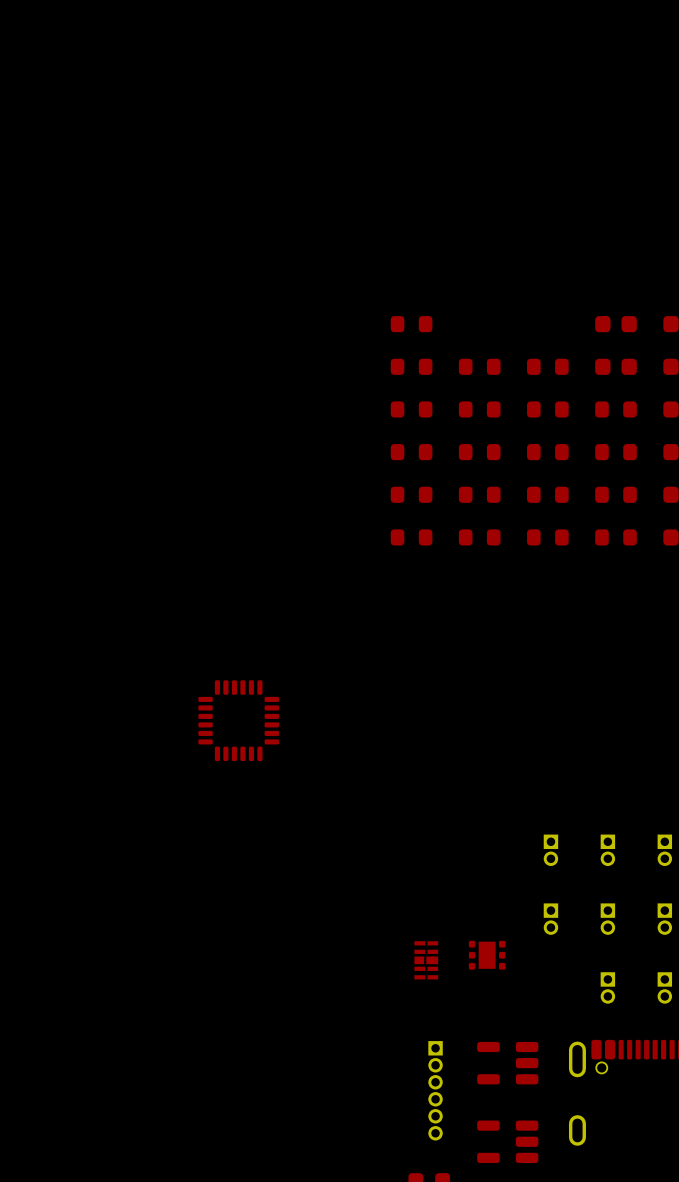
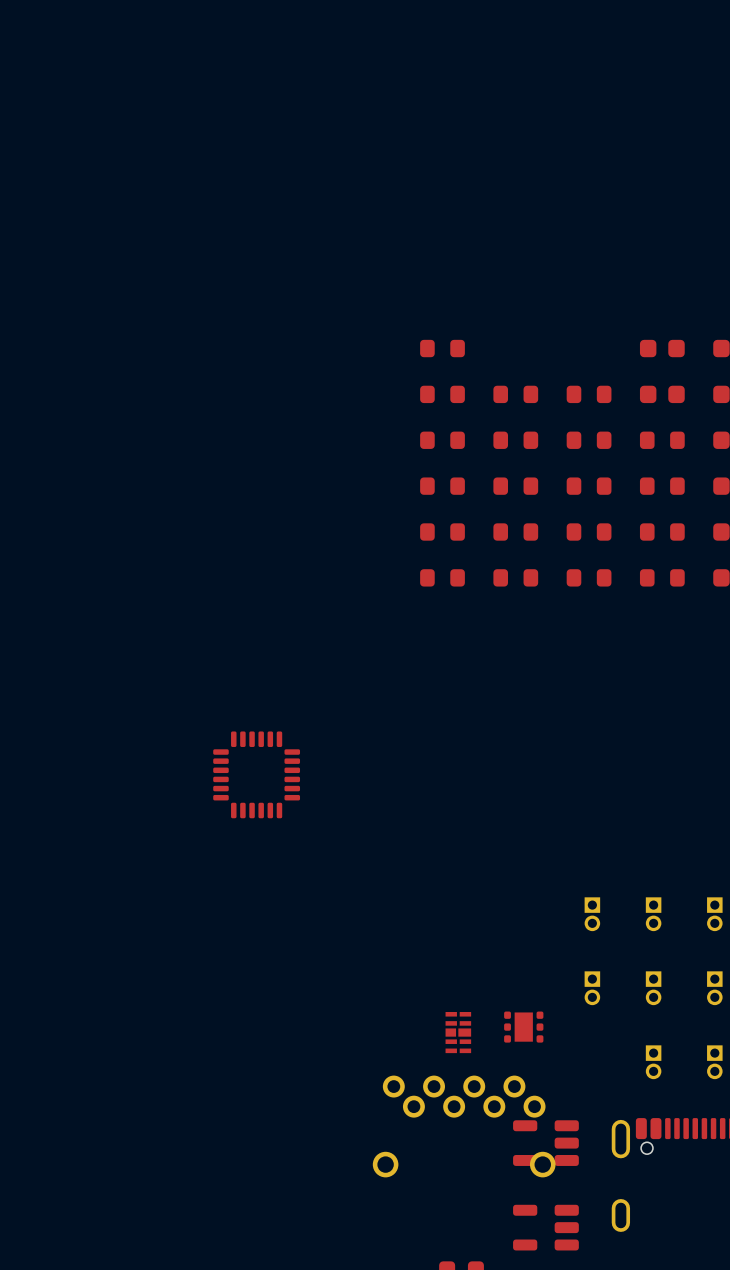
part: none -> (464, 1126)
part: (435, 1090) -> none

